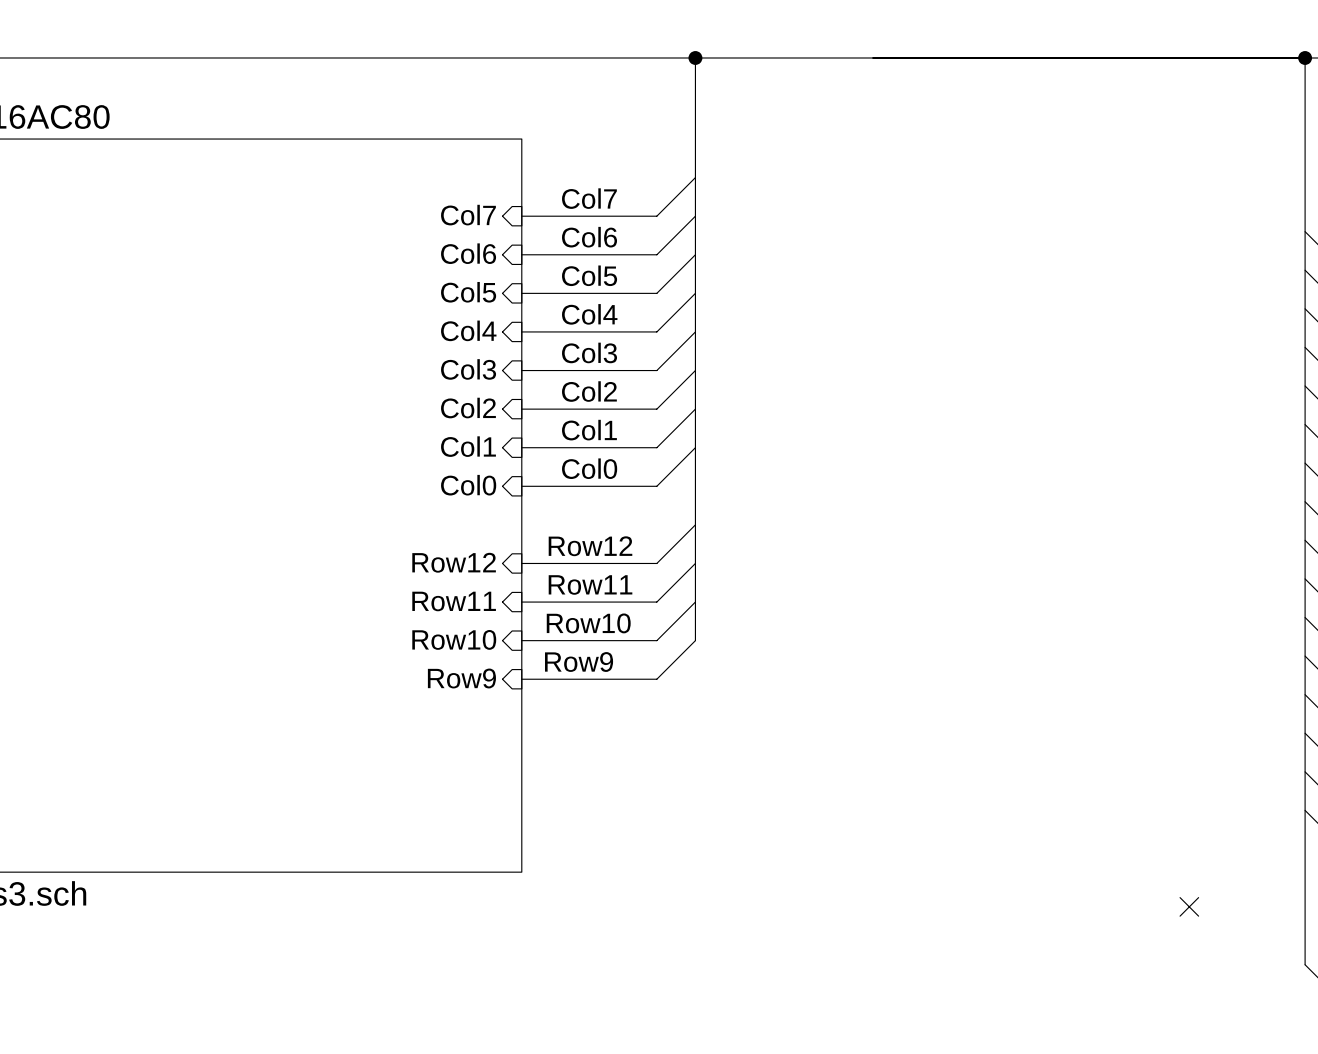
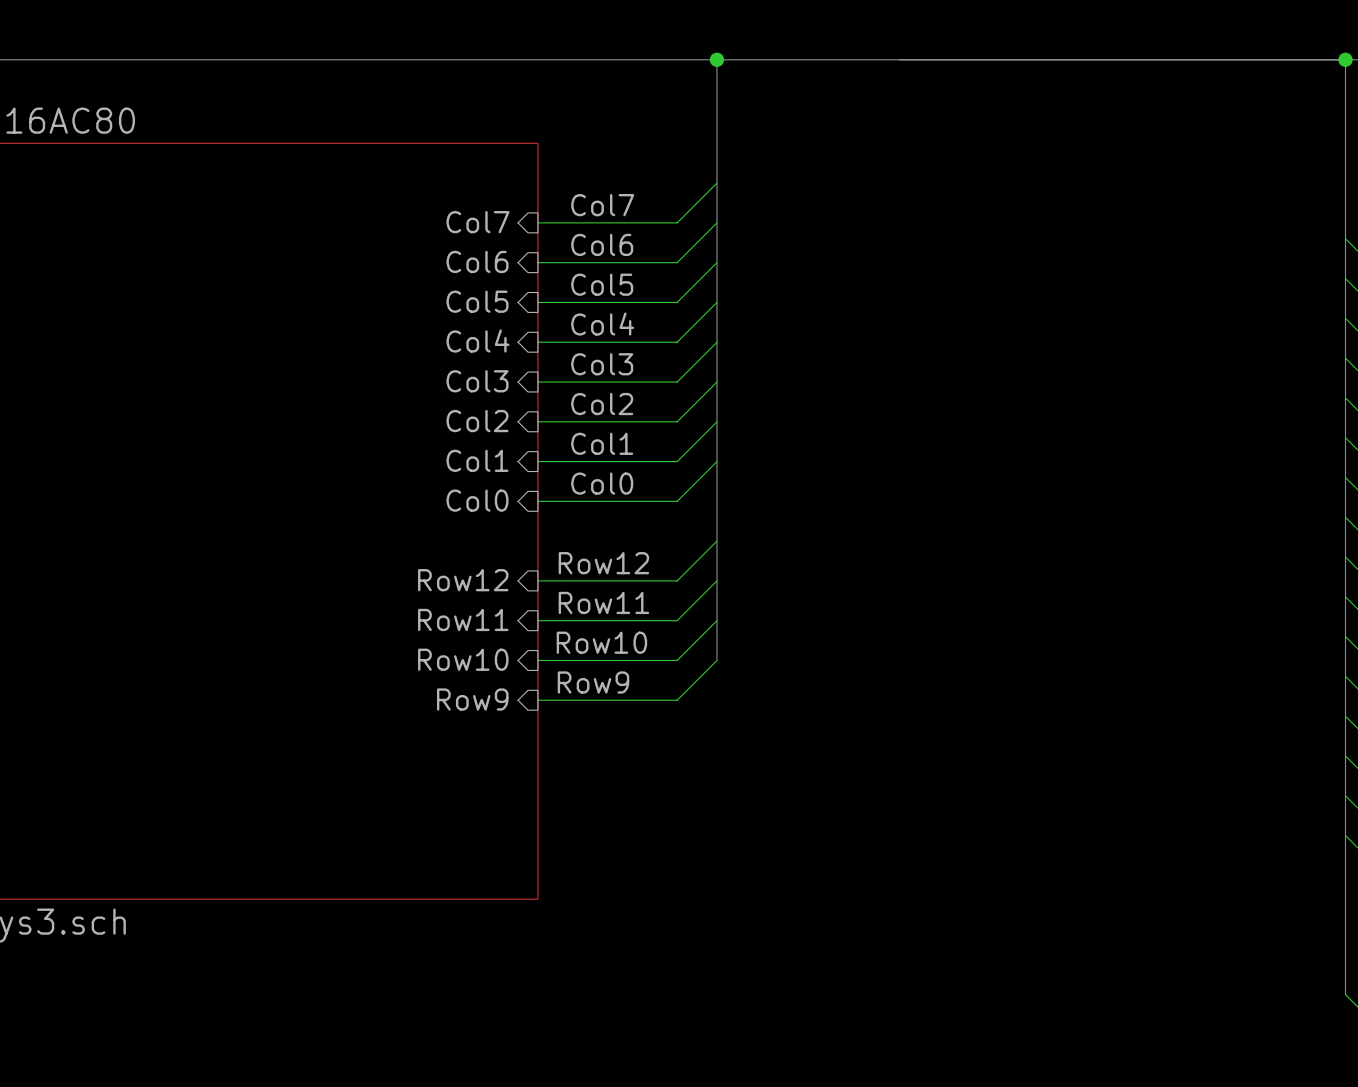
no-connect mark: (1189, 906) -> none

